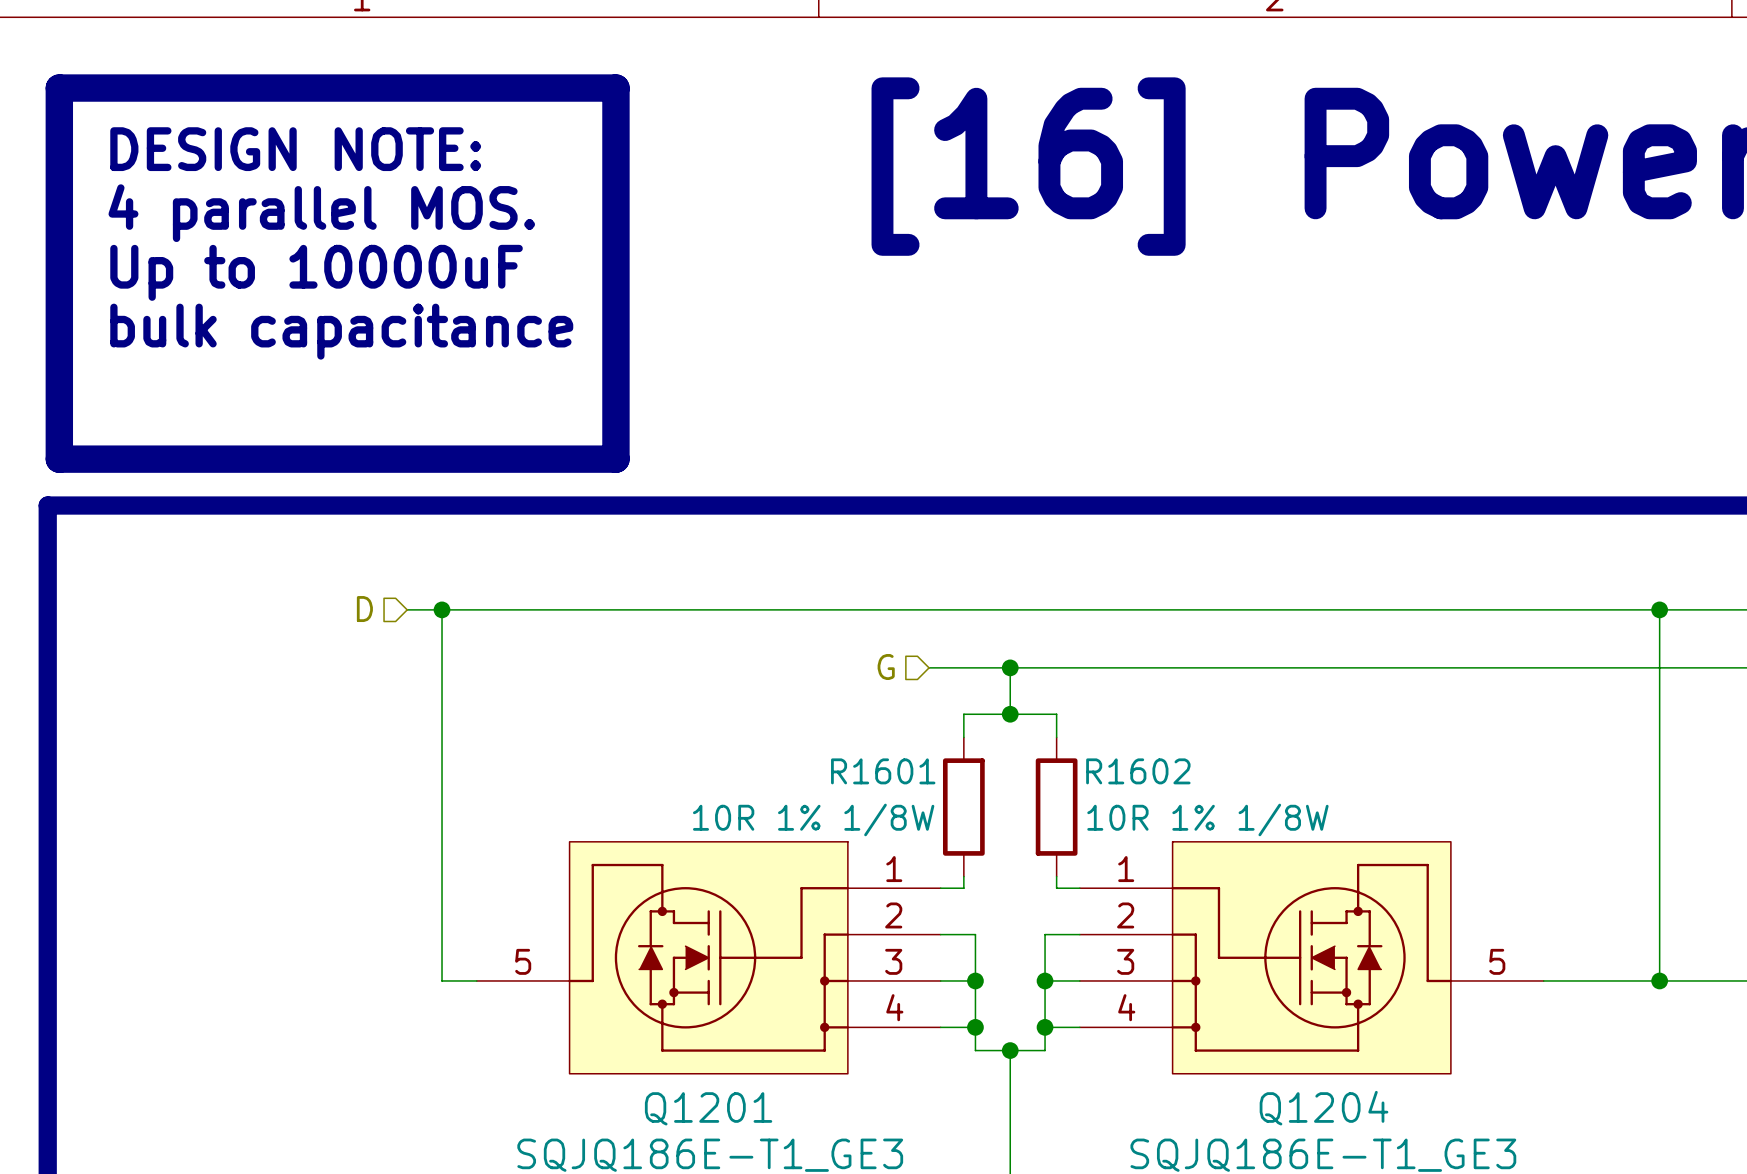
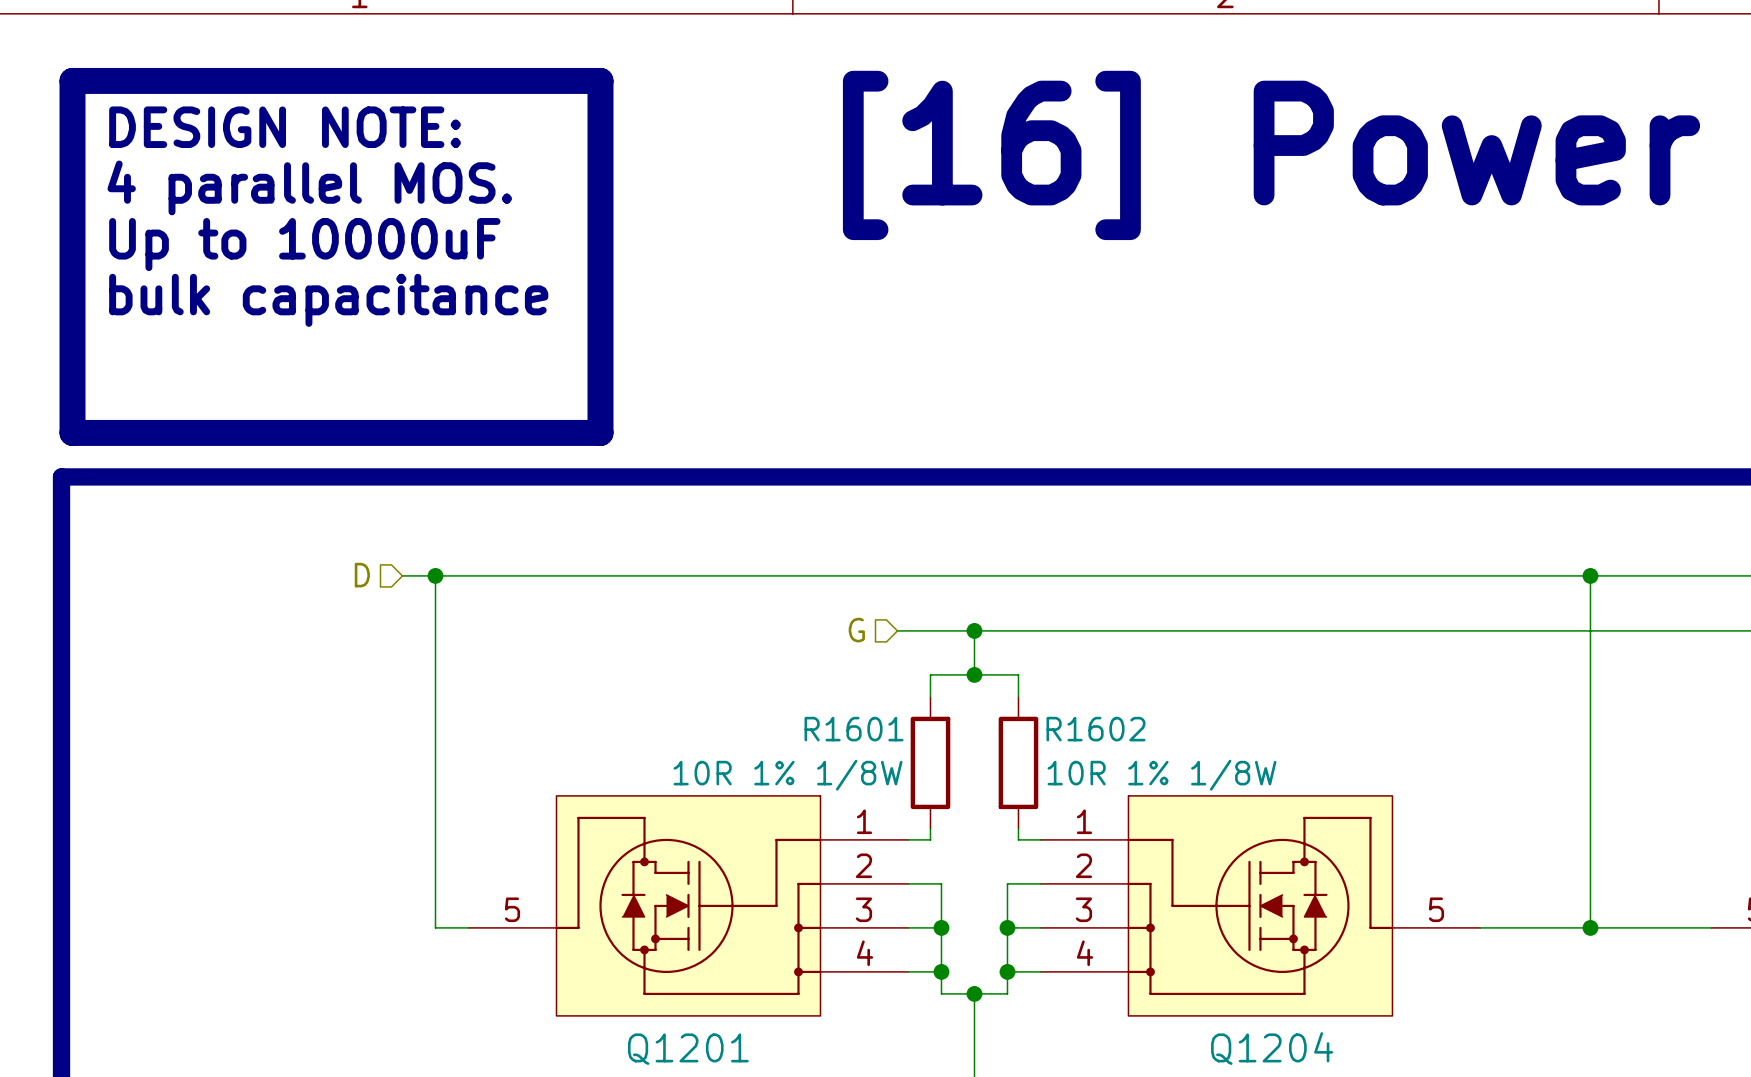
text position: DESIGN NOTE: (295, 149) -> DESIGN NOTE: (285, 127)
text position: 4 parallel MOS. (321, 213) -> 4 parallel MOS. (309, 187)
text position: Up to 10000uF (316, 272) -> Up to 10000uF (304, 244)
text position: bulk capacitance (341, 331) -> bulk capacitance (328, 300)

